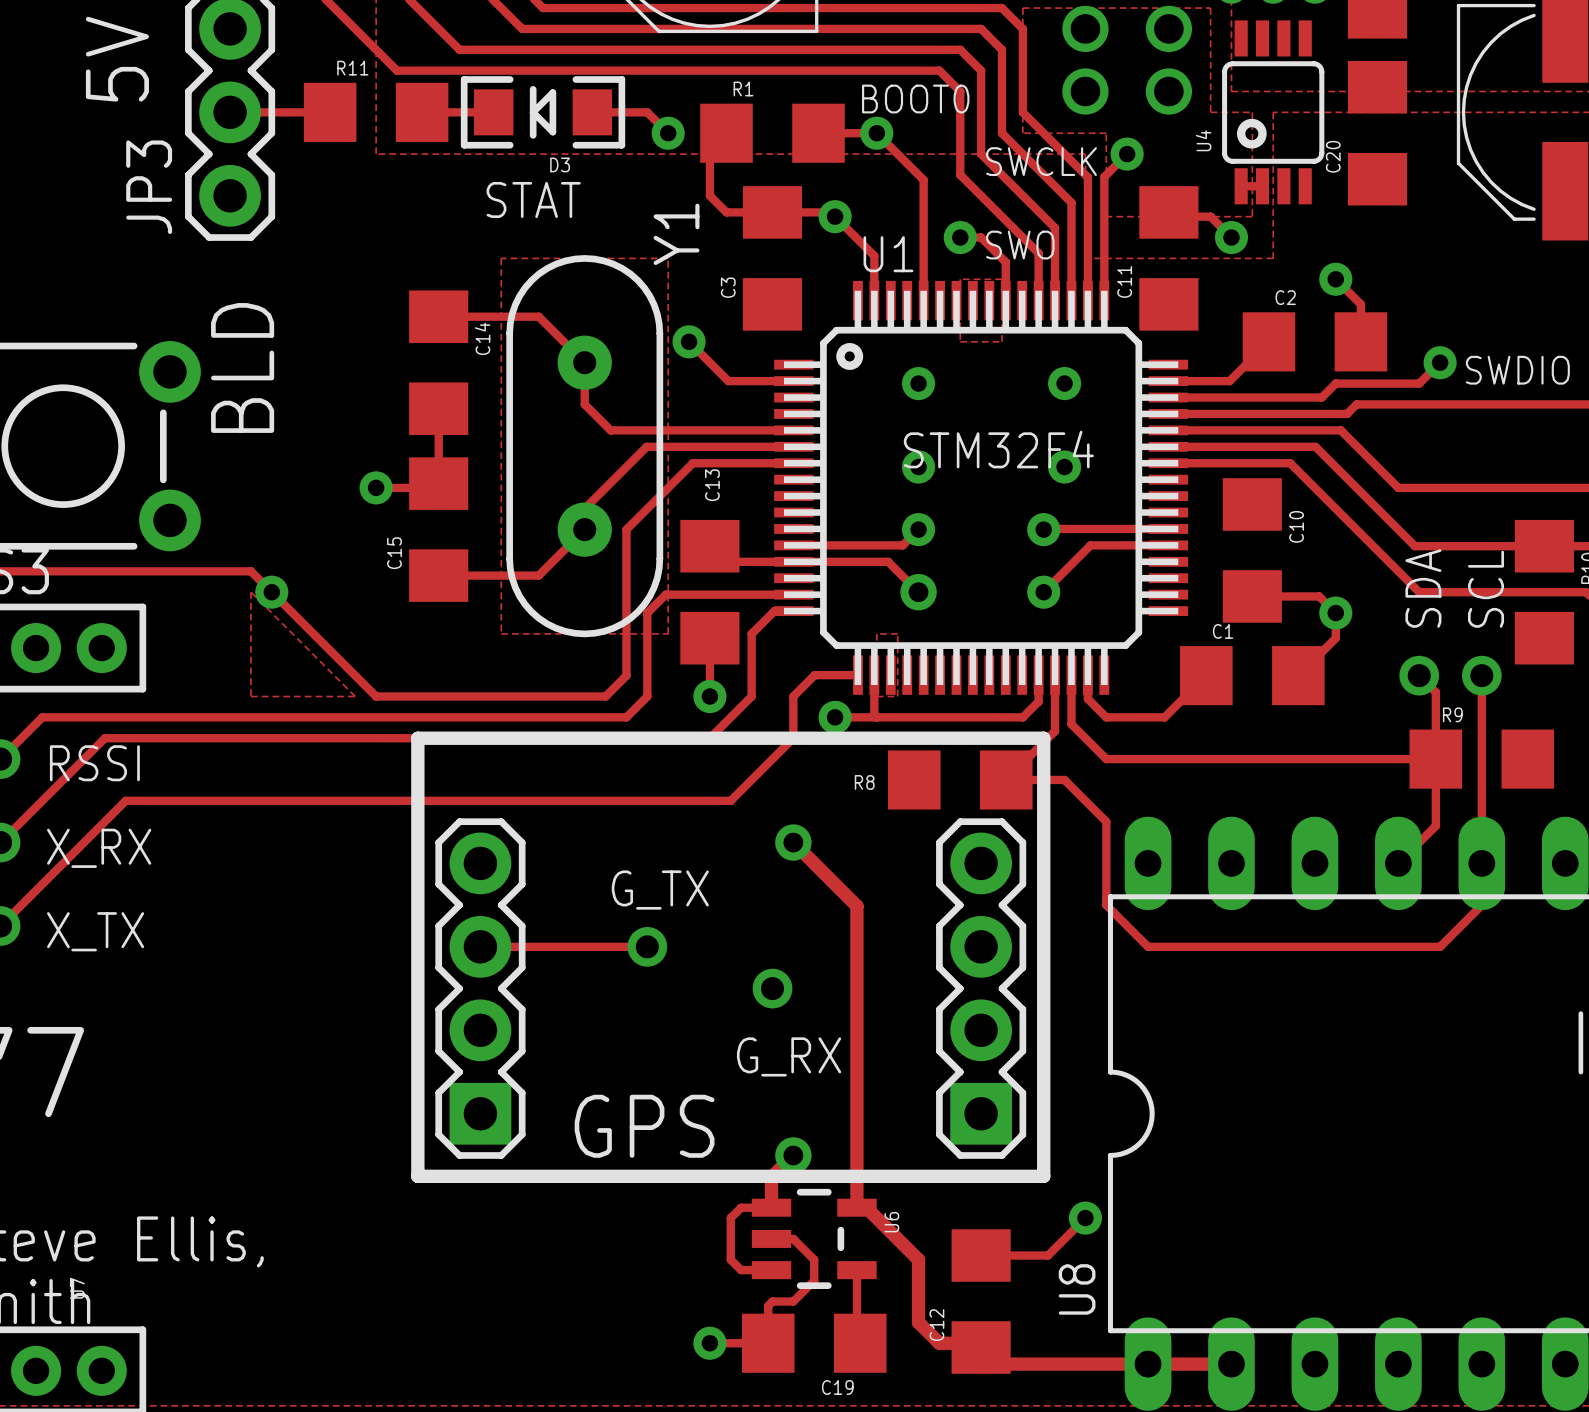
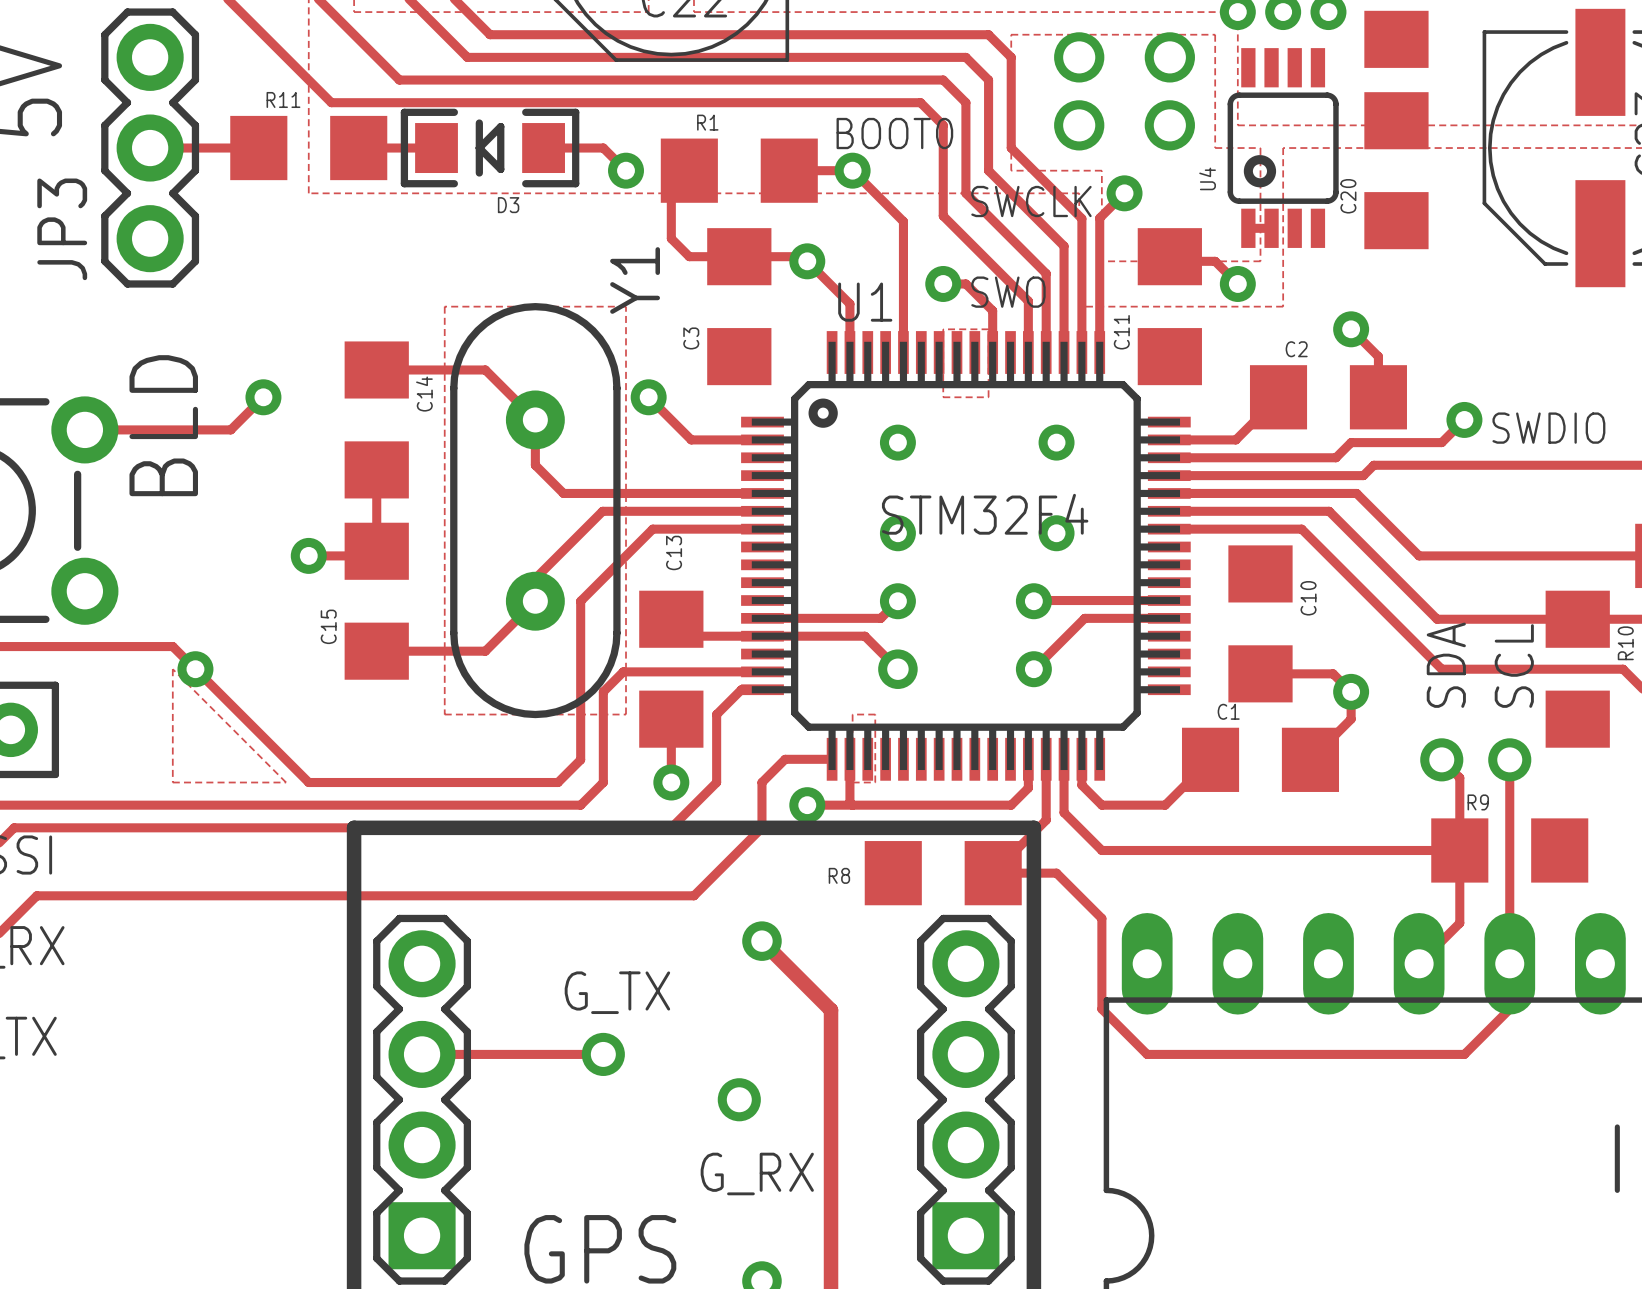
text: STAT (533, 199) -> none
track: none -> (263, 397) (230, 429) (84, 429)
via: none -> (263, 397)

